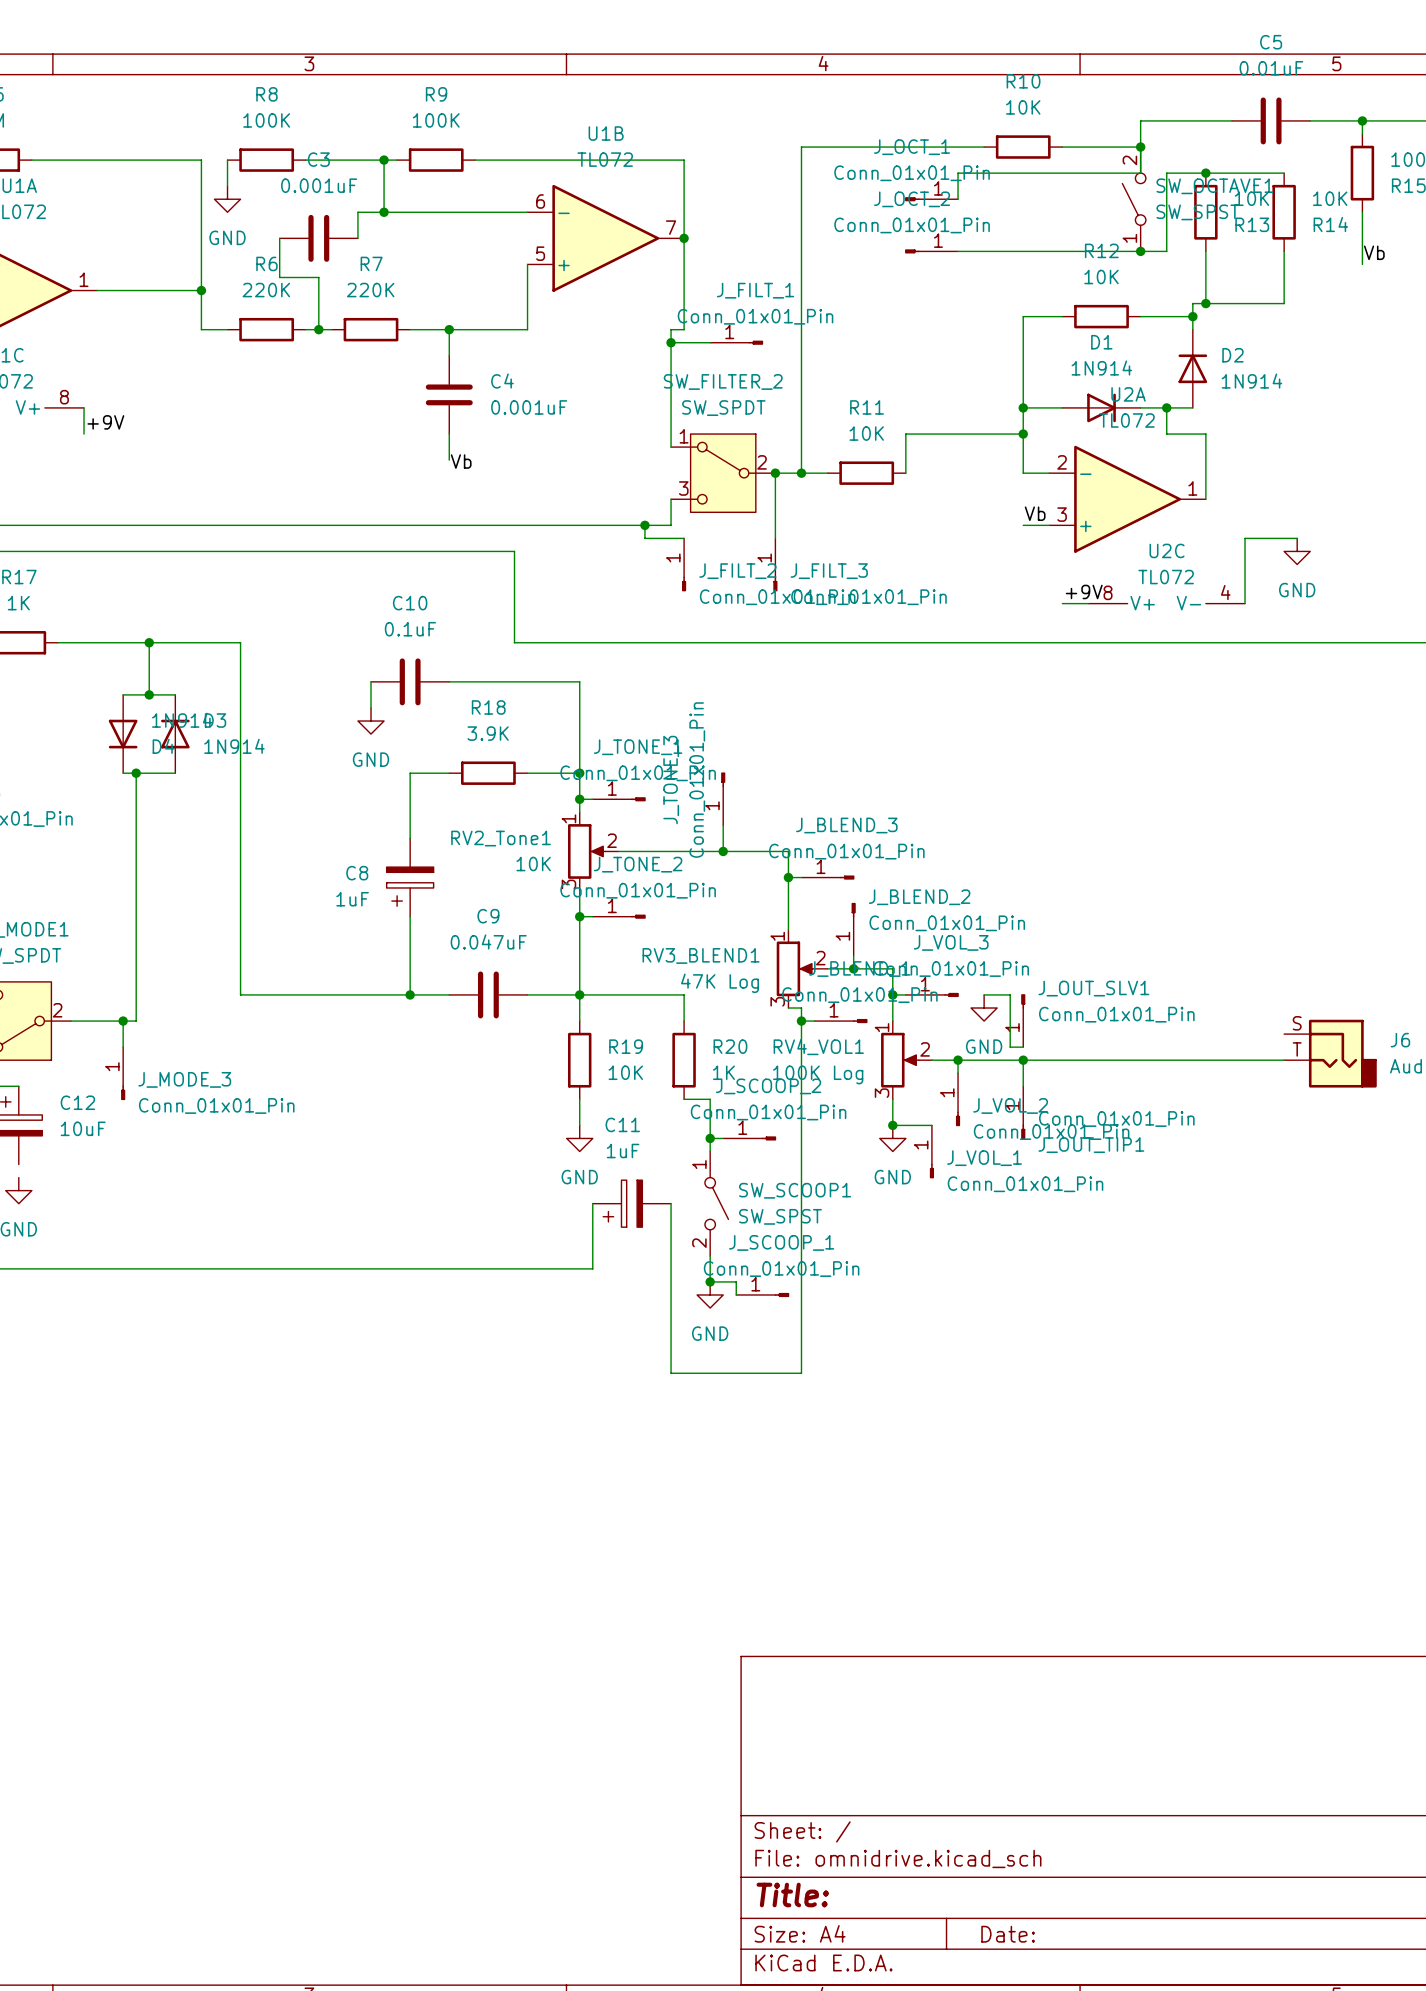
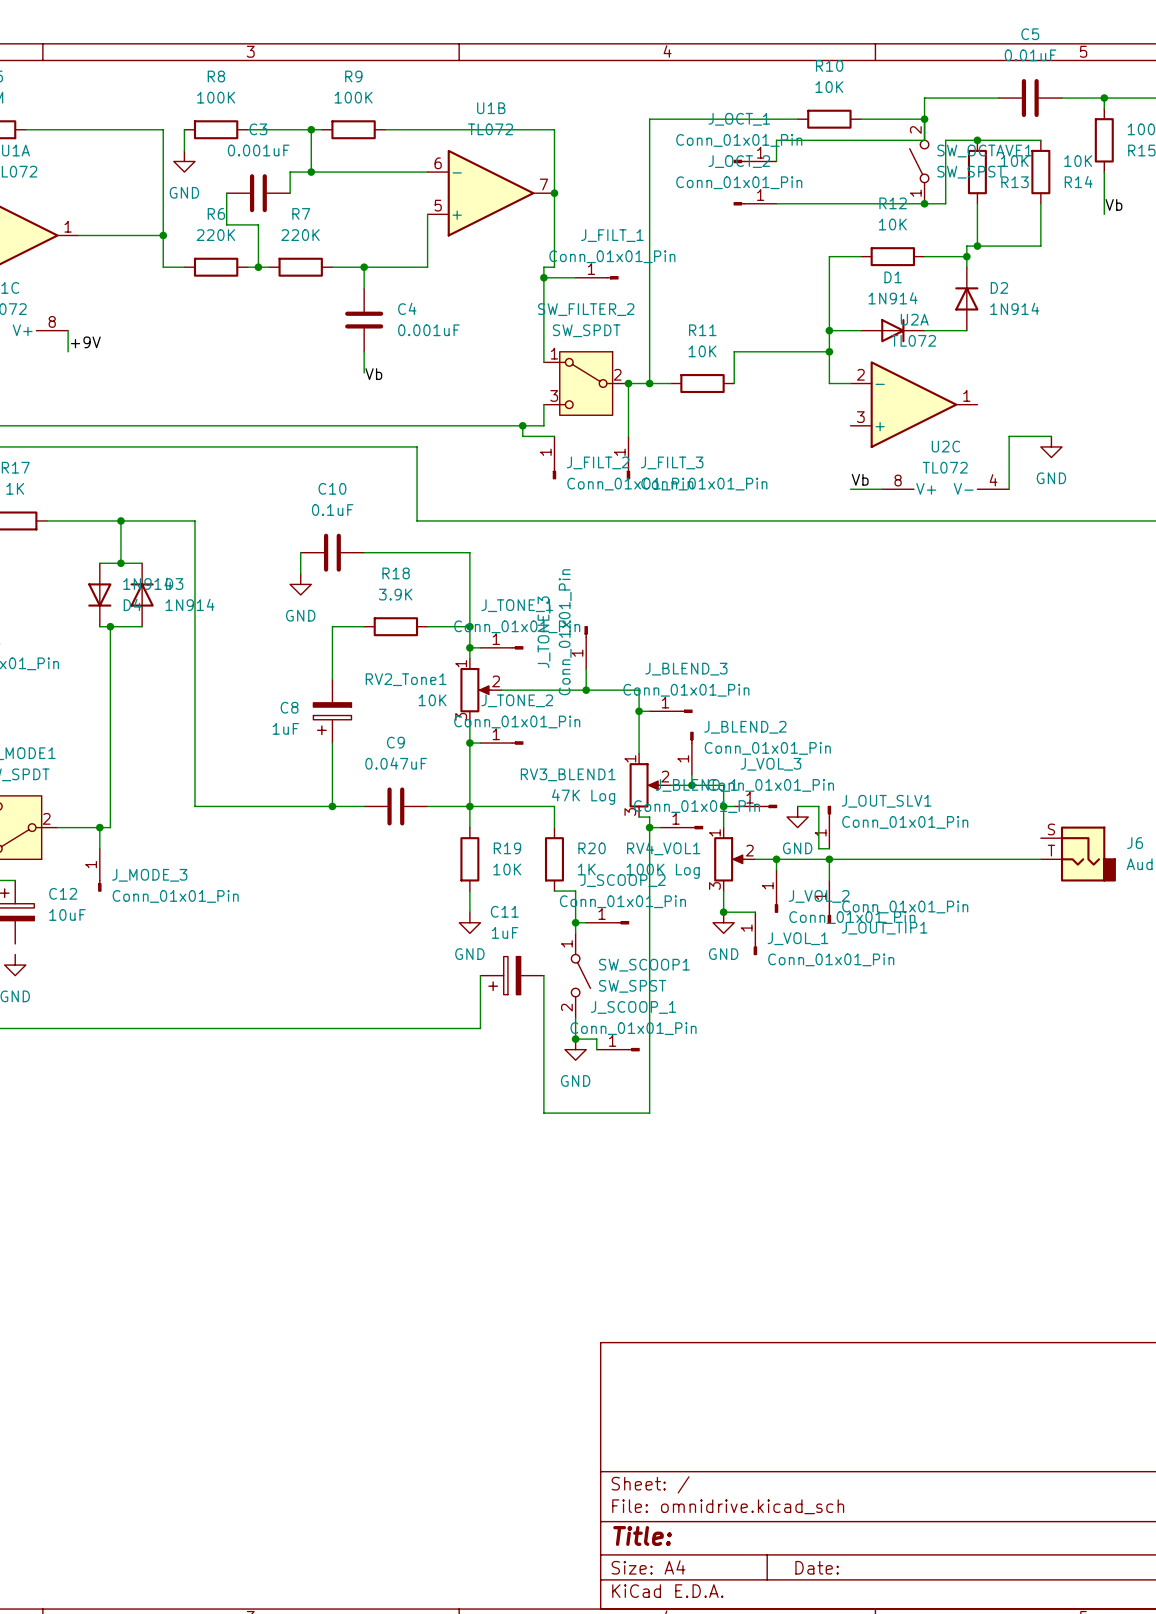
wire: (1166, 407) (1166, 434) (1205, 434) (1205, 499) -> none
junction: (1166, 407) -> none
label position: Vb (1035, 513) -> Vb (860, 479)
wire: (1023, 525) (1049, 525) -> none
label: +9V (1084, 591) -> none
wire: none -> (850, 489) (861, 489)

